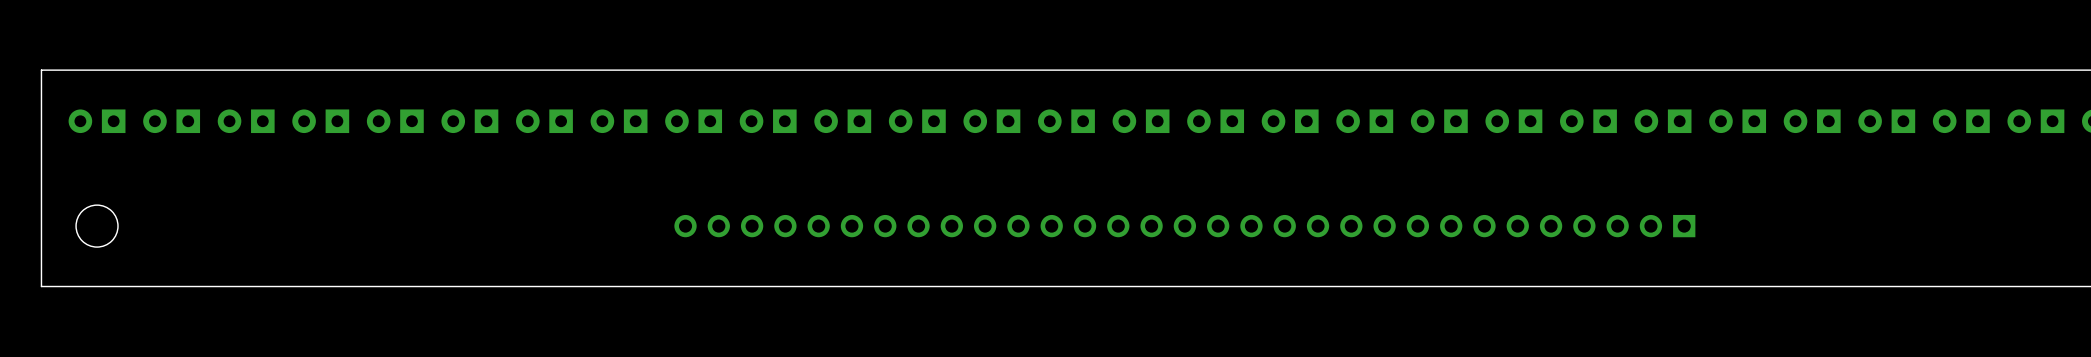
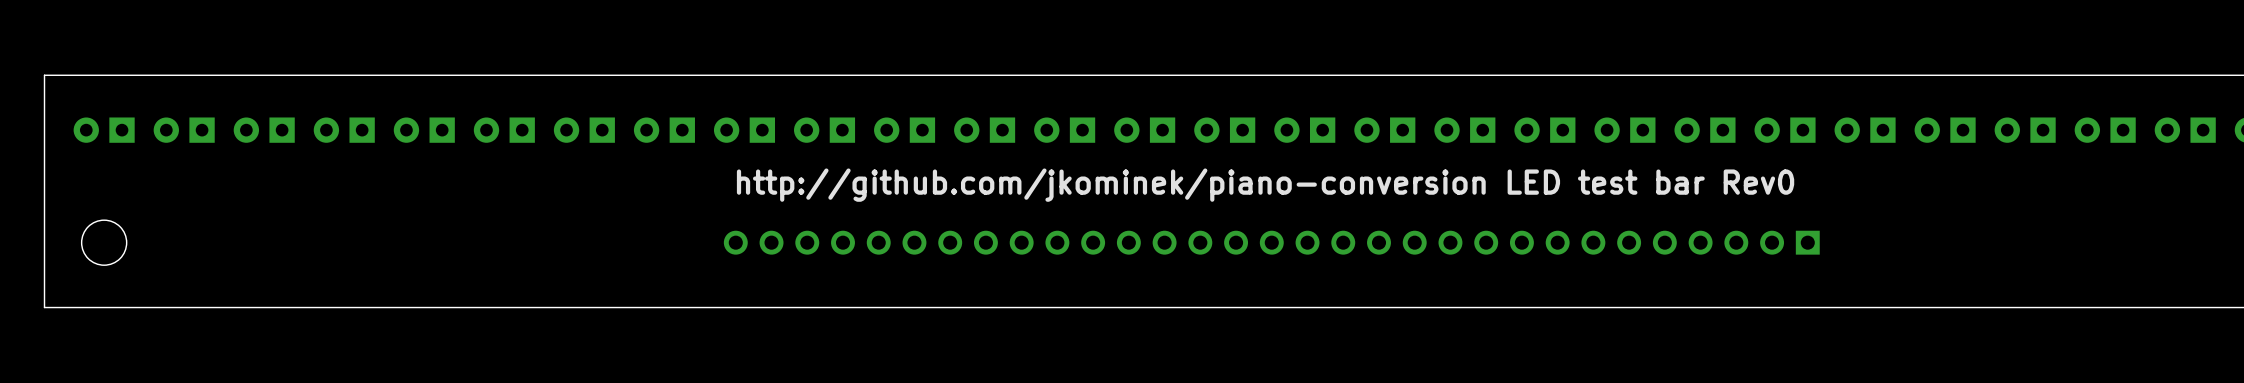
text: none -> http://github.com/jkominek/piano-conversion LED test bar Rev0 (1265, 185)

